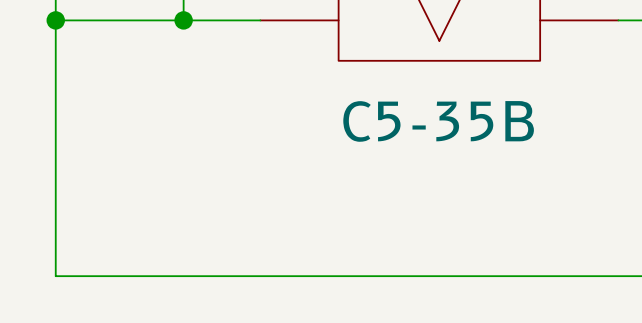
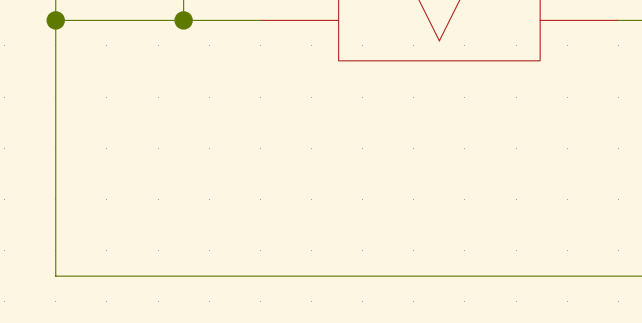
part text: C5-35В (438, 121) -> none

